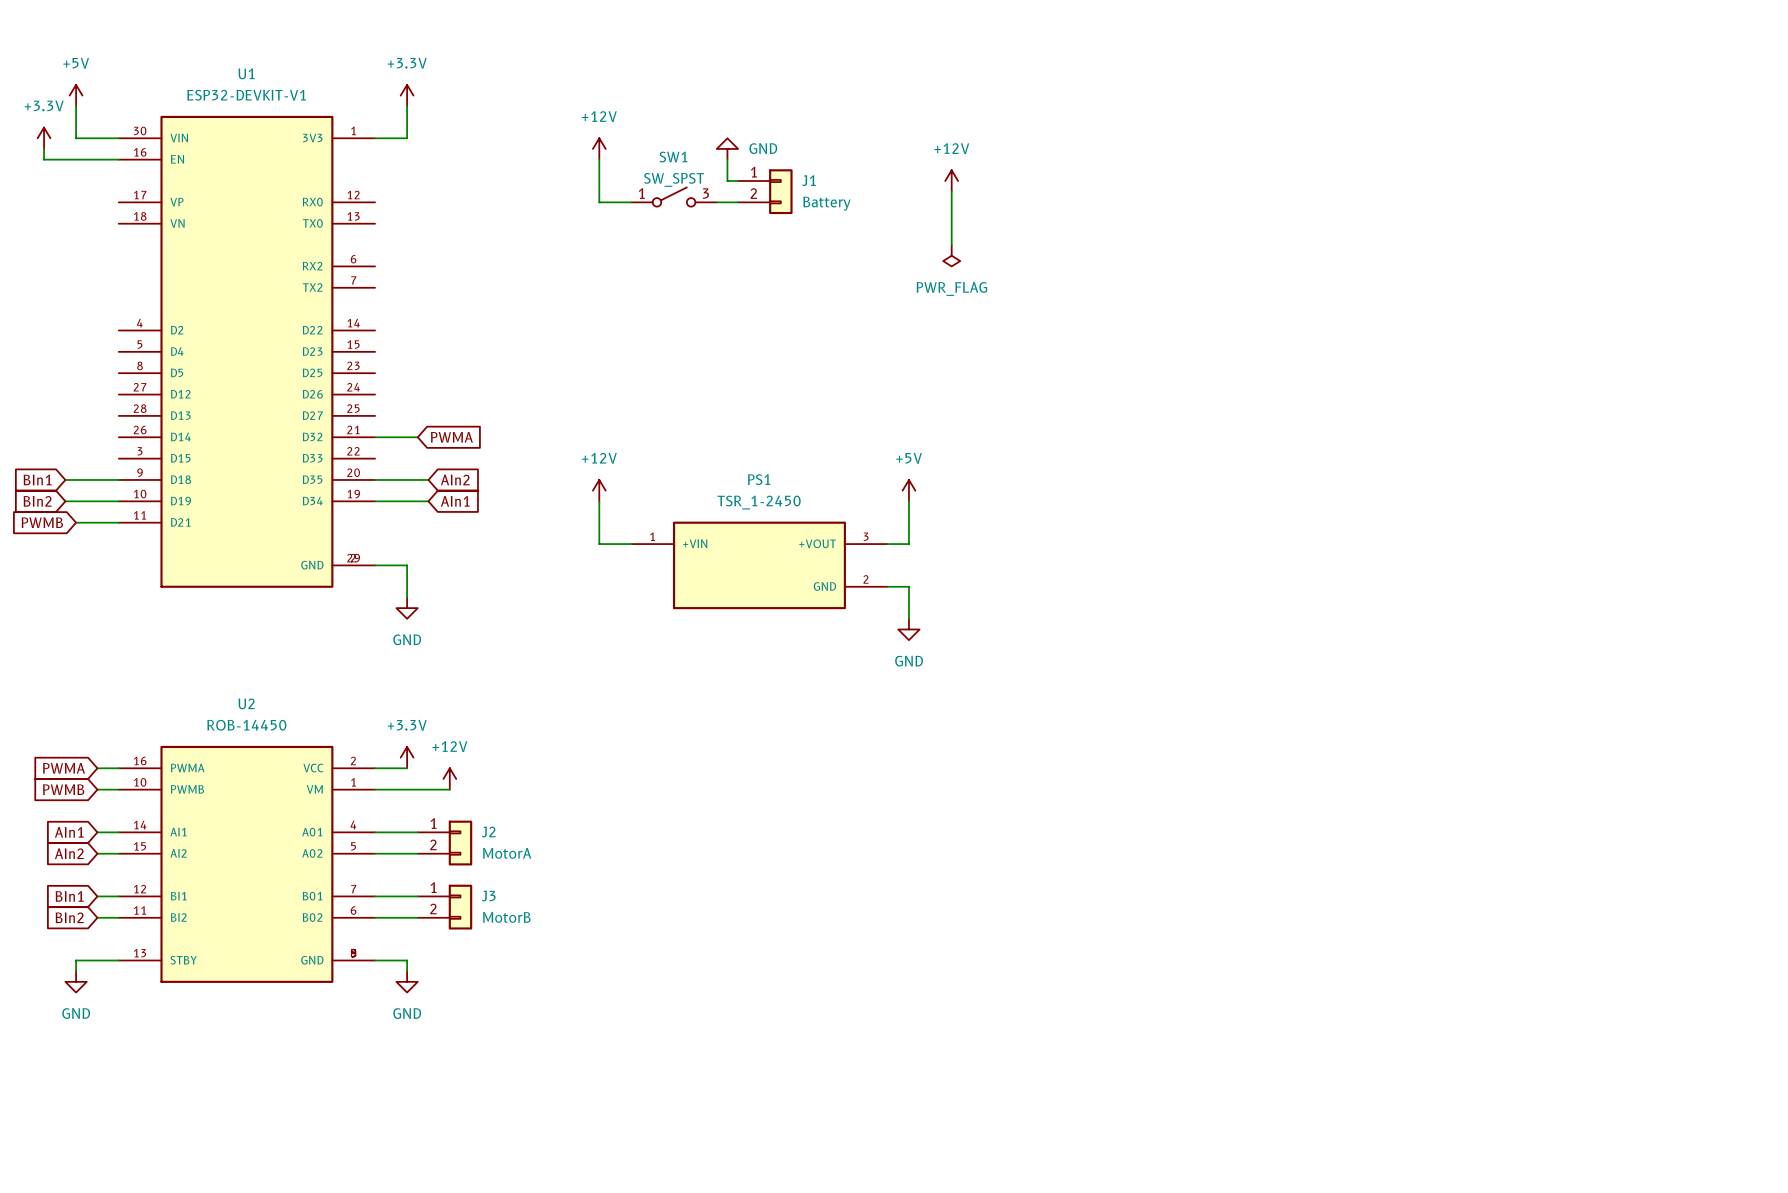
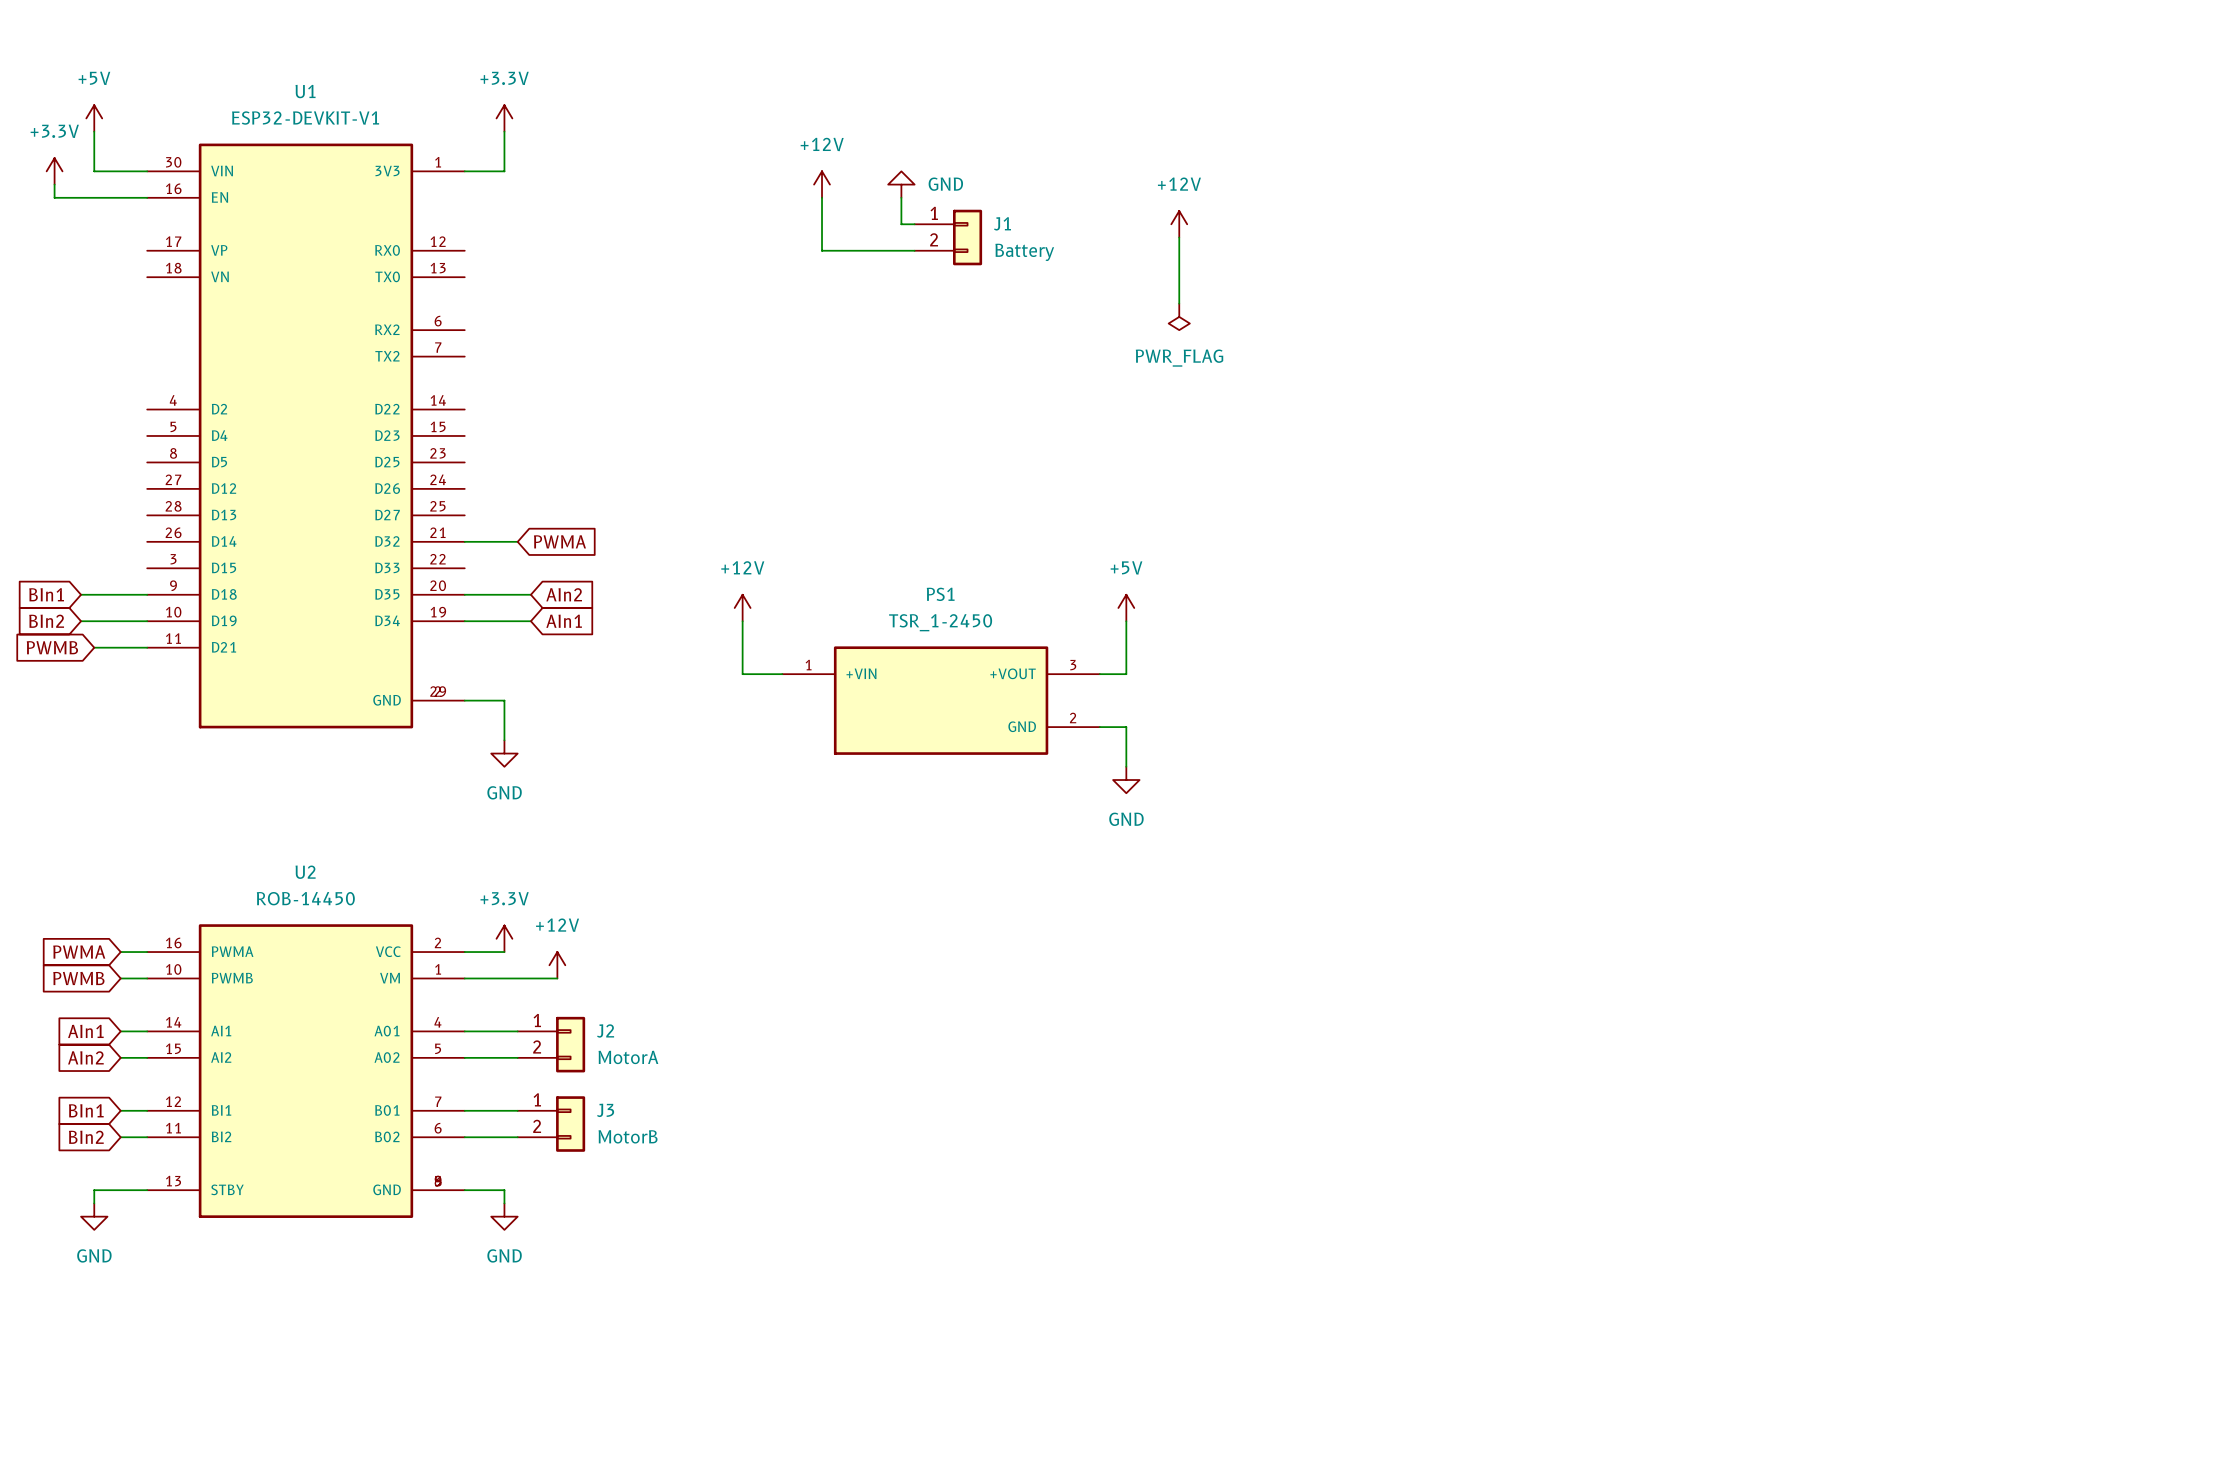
power symbol position: +12V (599, 148) -> +12V (822, 184)
wire: (599, 159) (599, 202) (631, 202) -> none
wire: none -> (822, 197) (822, 250) (888, 250)
SW1: SW_SPST (674, 197) -> none

